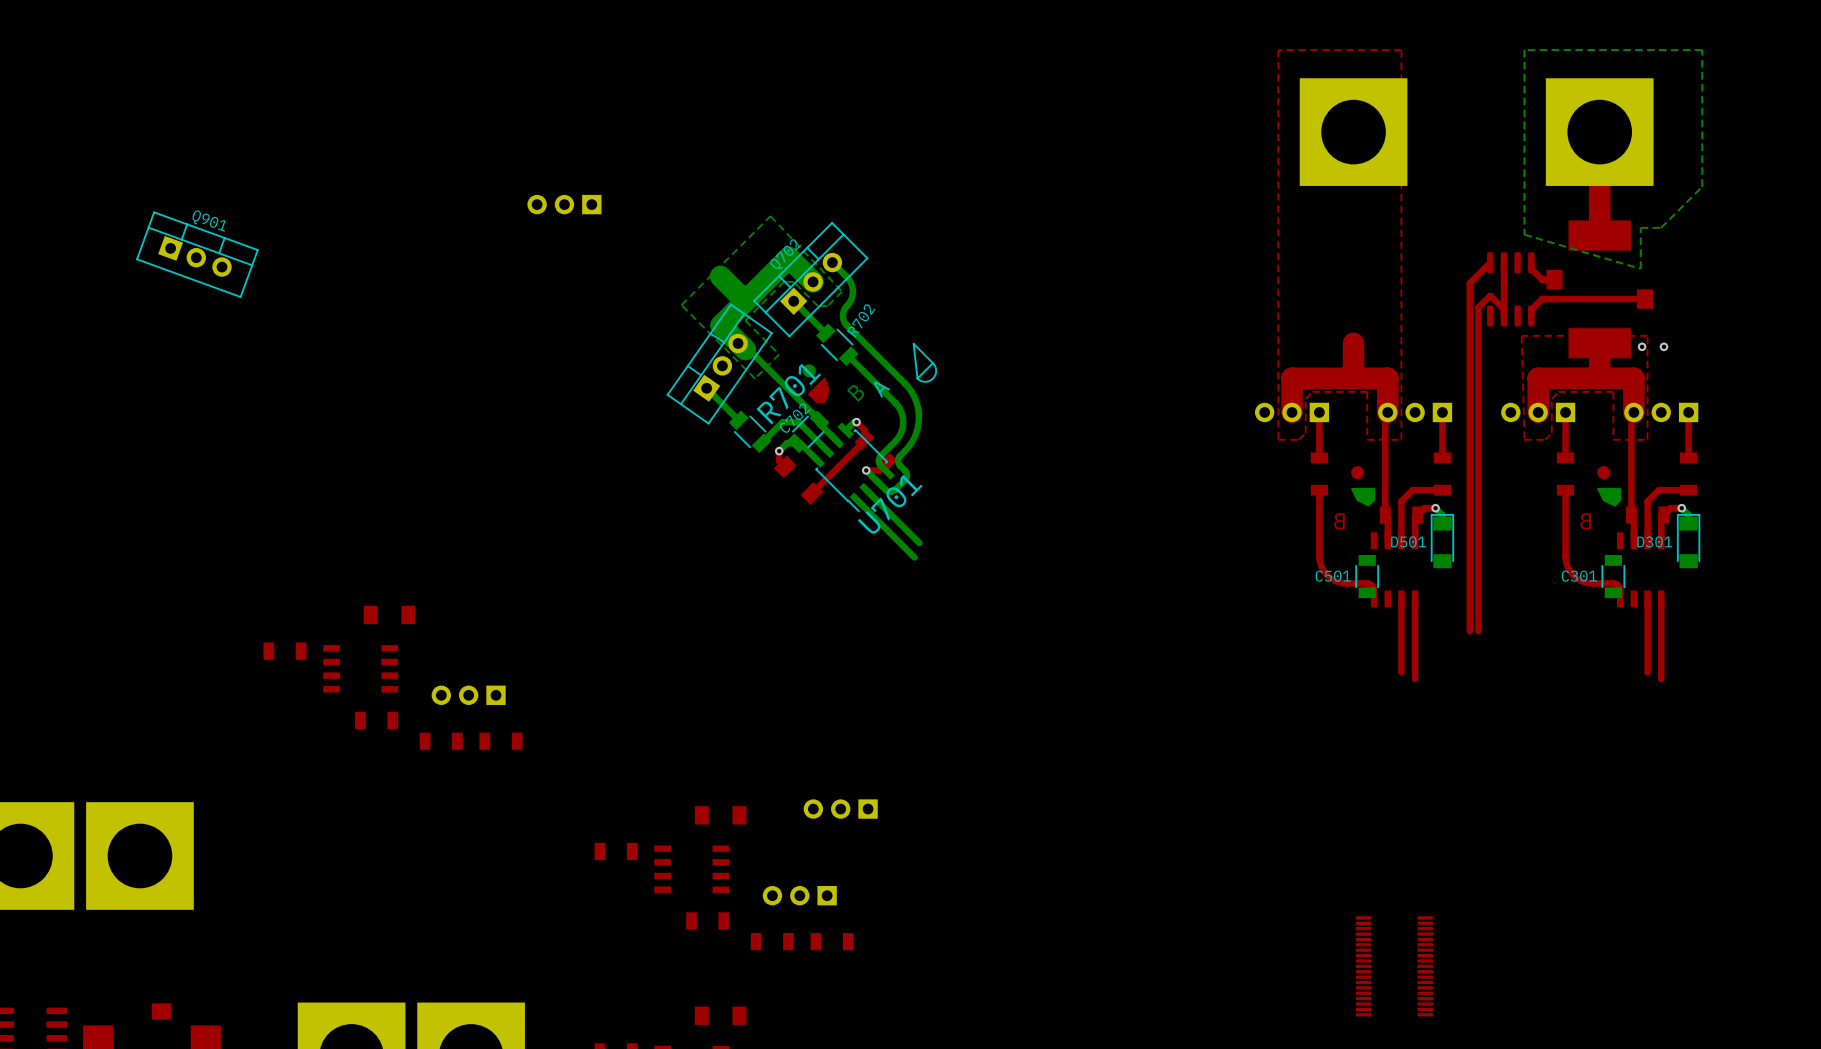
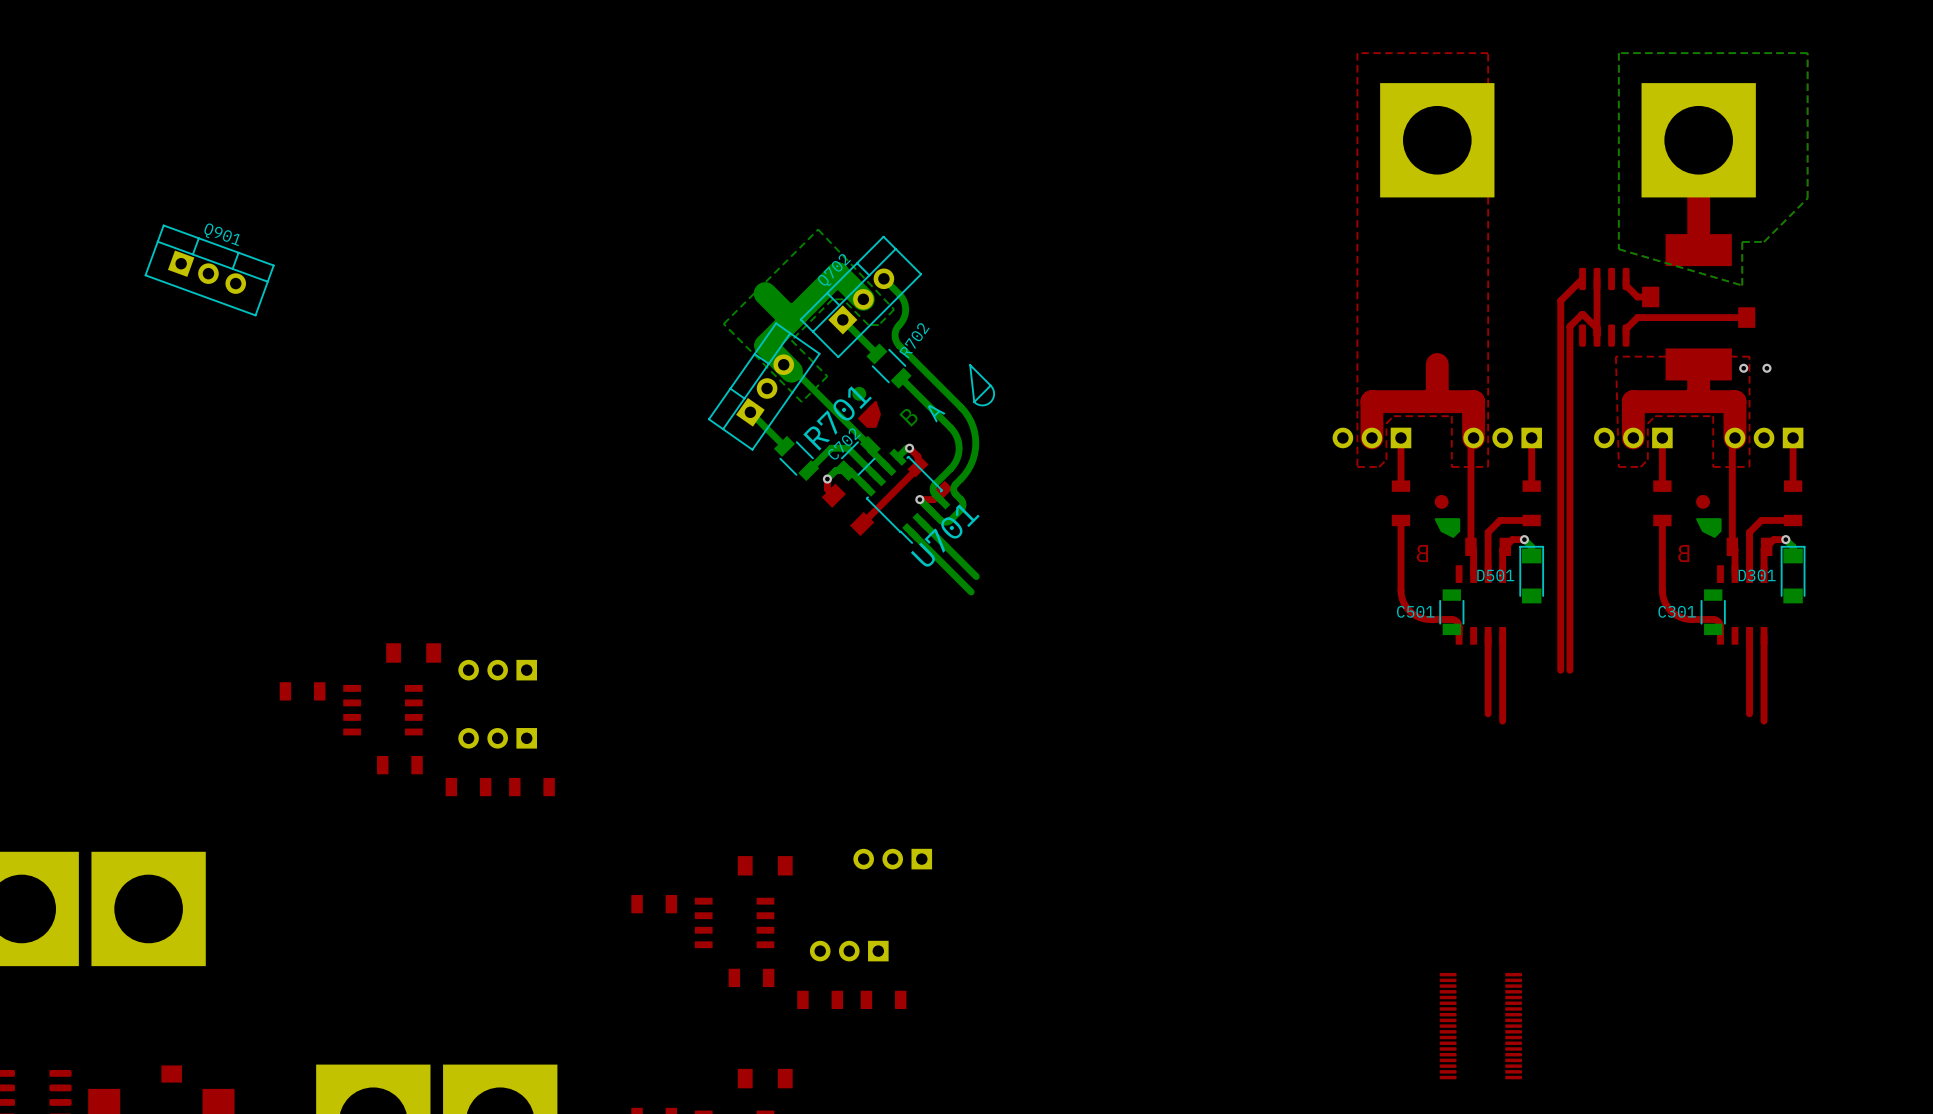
part: (564, 204) -> none
part: none -> (497, 670)

